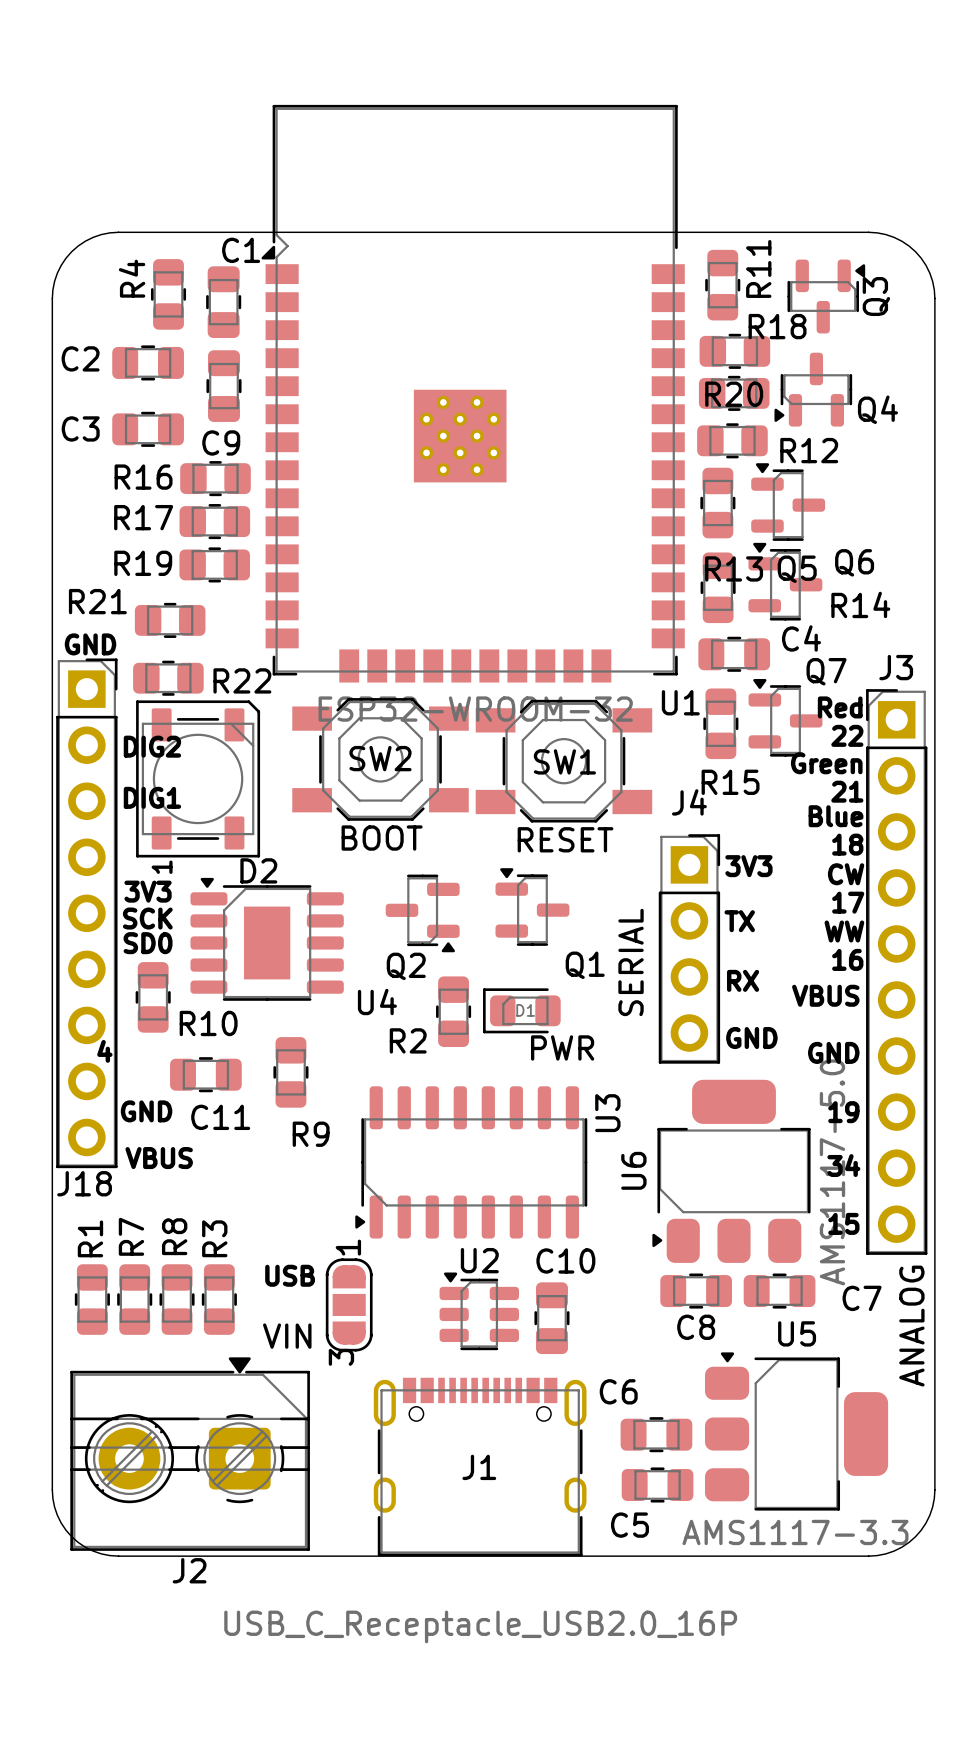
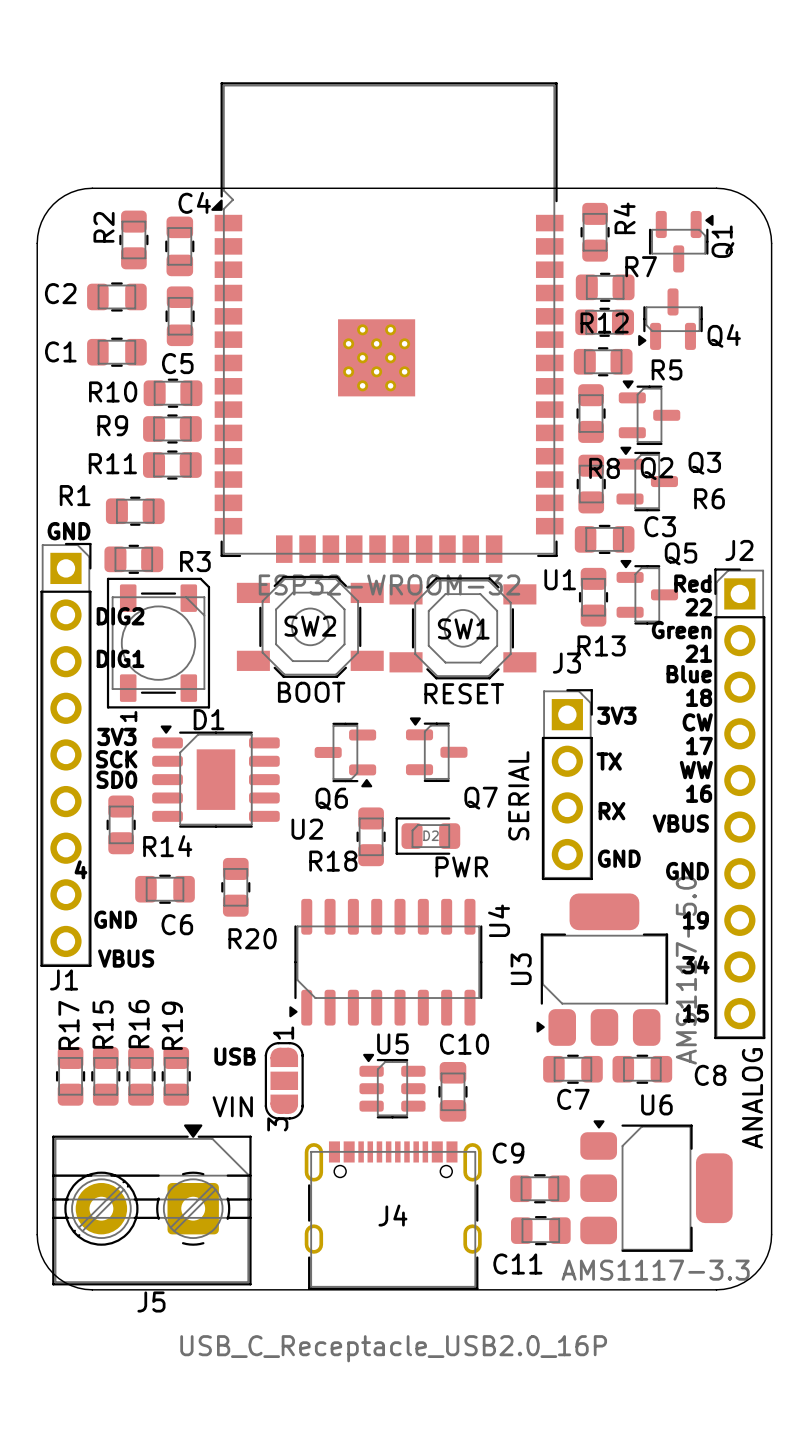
C1 name: C1 (241, 250) -> C4 (194, 202)
R11 name: R11 (758, 268) -> R4 (624, 218)
R4 name: R4 (132, 278) -> R2 (104, 227)
Q3 name: Q3 (876, 296) -> Q1 (722, 241)
R18 name: R18 (777, 326) -> R7 (641, 266)
R20 name: R20 (734, 394) -> R12 (604, 322)
C3 name: C3 (80, 428) -> C1 (60, 351)
C9 name: C9 (221, 442) -> C5 (177, 363)
R12 name: R12 (809, 450) -> R5 (667, 369)
R16 name: R16 (143, 477) -> R10 (113, 391)
R17 name: R17 (143, 517) -> R9 (112, 425)
Q6 name: Q6 (854, 562) -> Q3 (704, 463)
R19 name: R19 (143, 563) -> R11 (112, 463)
R13 name: R13 (734, 568) -> R8 (604, 468)
Q5 name: Q5 (797, 569) -> Q2 (657, 468)
R21 name: R21 (97, 601) -> R1 (75, 495)
R14 name: R14 (860, 604) -> R6 (709, 498)
C4 name: C4 (801, 638) -> C3 (660, 526)
J3 name: J3 (896, 667) -> J2 (739, 550)
Q7 name: Q7 (826, 671) -> Q5 (681, 553)
R22 name: R22 (242, 680) -> R3 (195, 561)
R15 name: R15 (730, 782) -> R13 (601, 645)
J4 name: J4 (689, 802) -> J3 (566, 663)
D2 name: D2 (258, 870) -> D1 (209, 719)
Q1 name: Q1 (585, 965) -> Q7 (481, 798)
Q2 name: Q2 (406, 966) -> Q6 (331, 799)
U4 name: U4 (377, 1001) -> U2 (307, 829)
D1 name: D1 (525, 1010) -> D2 (431, 835)
R10 name: R10 (208, 1023) -> R14 (167, 846)
R2 name: R2 (408, 1040) -> R18 (333, 861)
U3 name: U3 (607, 1113) -> U4 (499, 920)
C11 name: C11 (220, 1117) -> C6 (177, 924)
R9 name: R9 (311, 1134) -> R20 (252, 938)
U6 name: U6 (633, 1170) -> U3 (521, 969)
J18 name: J18 (84, 1183) -> J1 (64, 979)
R7 name: R7 (131, 1236) -> R15 (103, 1024)
R8 name: R8 (174, 1236) -> R16 (139, 1024)
R1 name: R1 (90, 1238) -> R17 (68, 1025)
R3 name: R3 (214, 1238) -> R19 (172, 1025)
U2 name: U2 (479, 1260) -> U5 (392, 1043)
C7 name: C7 (862, 1298) -> C8 (710, 1075)
C8 name: C8 (696, 1327) -> C7 (573, 1099)
U5 name: U5 (797, 1333) -> U6 (656, 1104)
C6 name: C6 (618, 1391) -> C9 (508, 1153)
J1 name: J1 (479, 1467) -> J4 (392, 1215)
C5 name: C5 (629, 1525) -> C11 (517, 1263)
J2 name: J2 (189, 1570) -> J5 (151, 1301)

